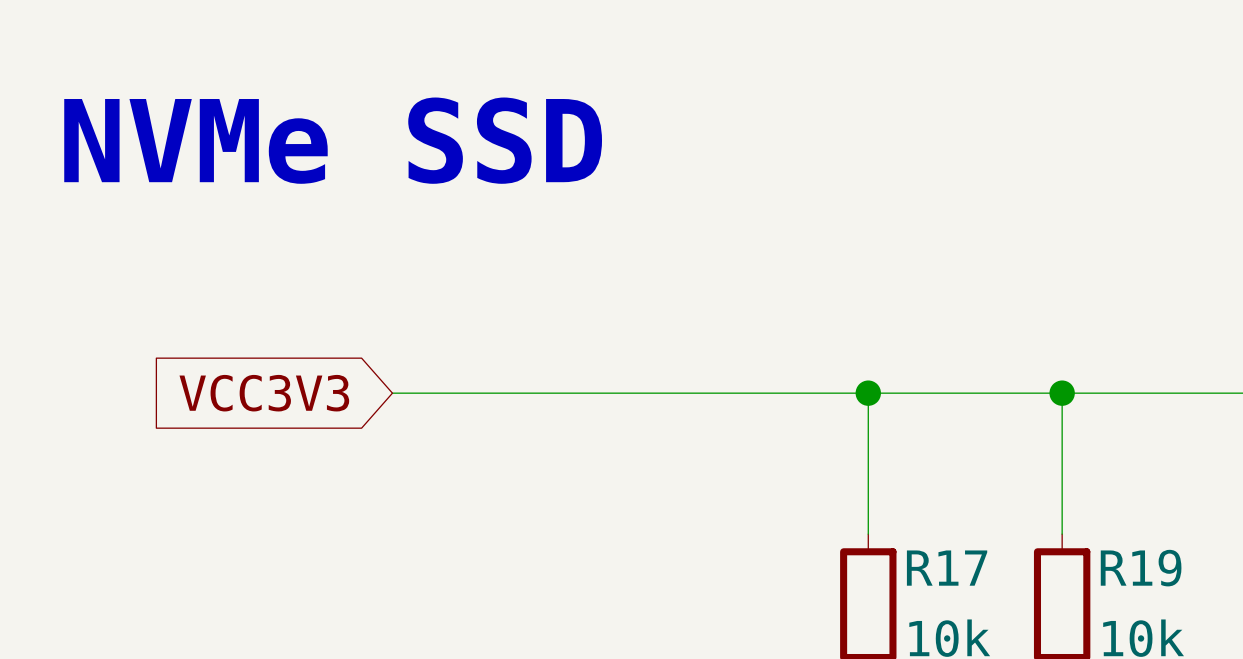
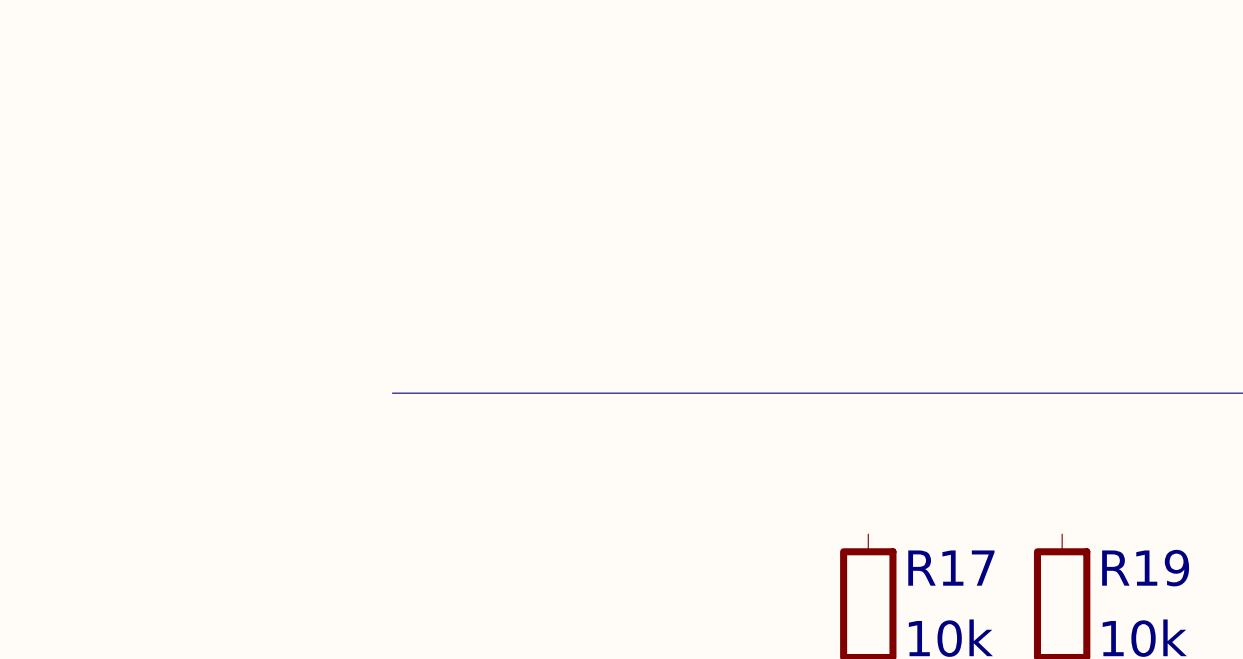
text: NVMe SSD (333, 140) -> none
global label: VCC3V3 (264, 393) -> none
wire: (868, 393) (868, 534) -> none
junction: (868, 393) -> none
wire: (1062, 393) (1062, 534) -> none
junction: (1062, 393) -> none

